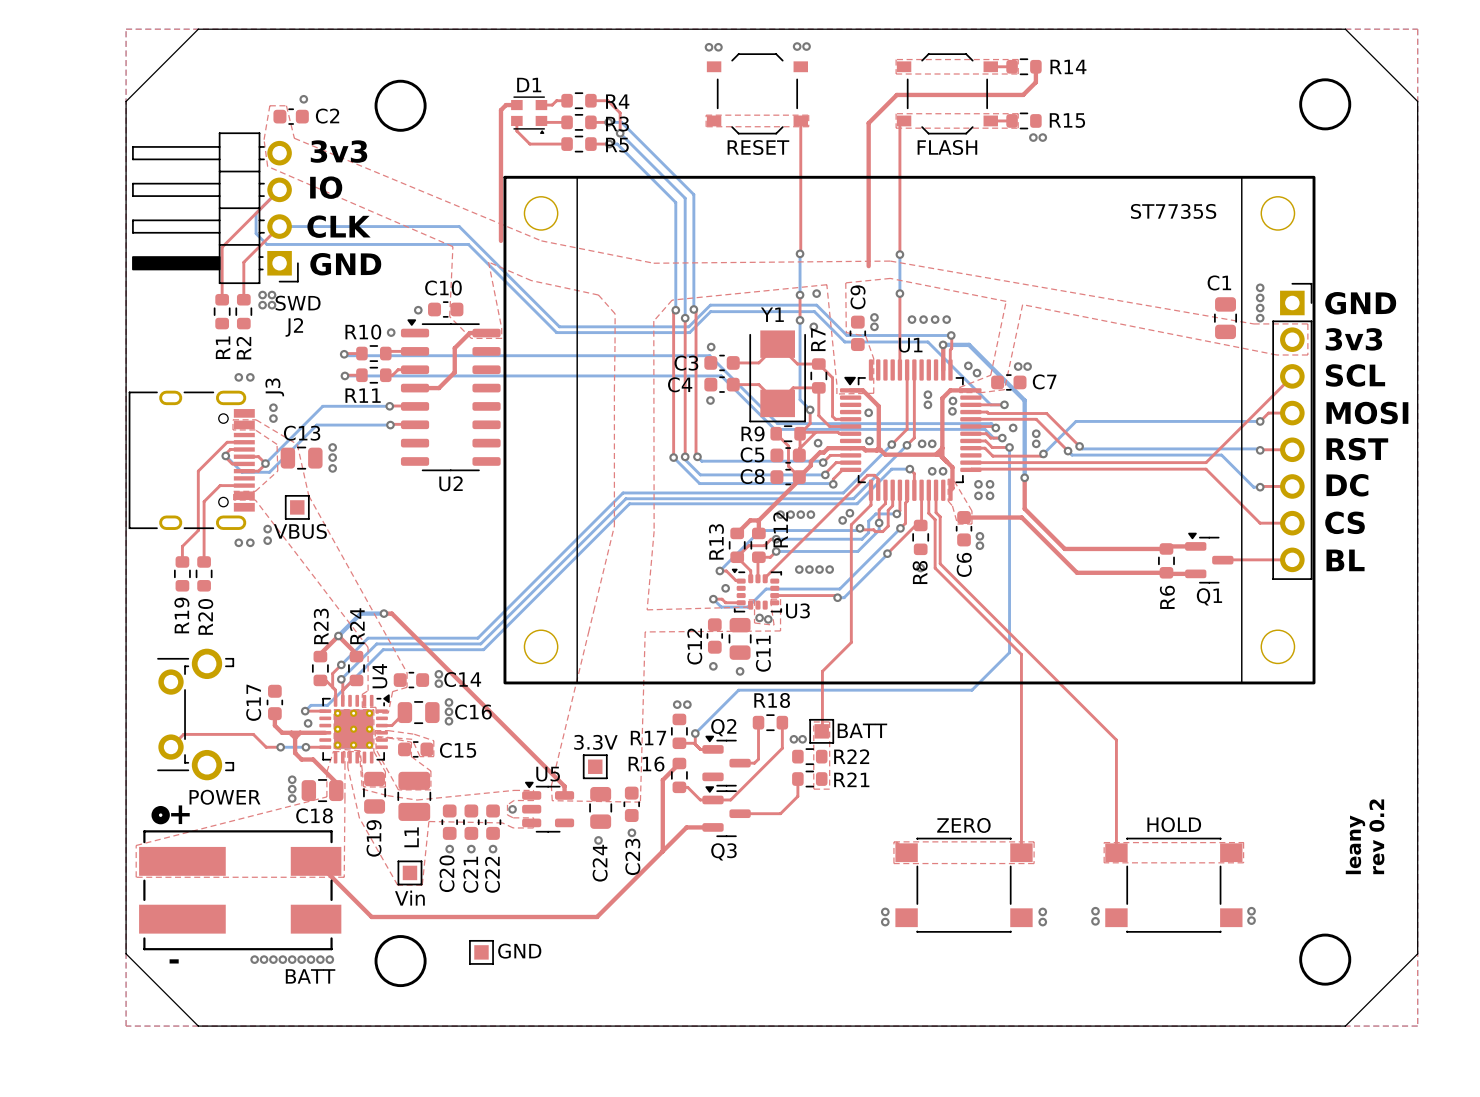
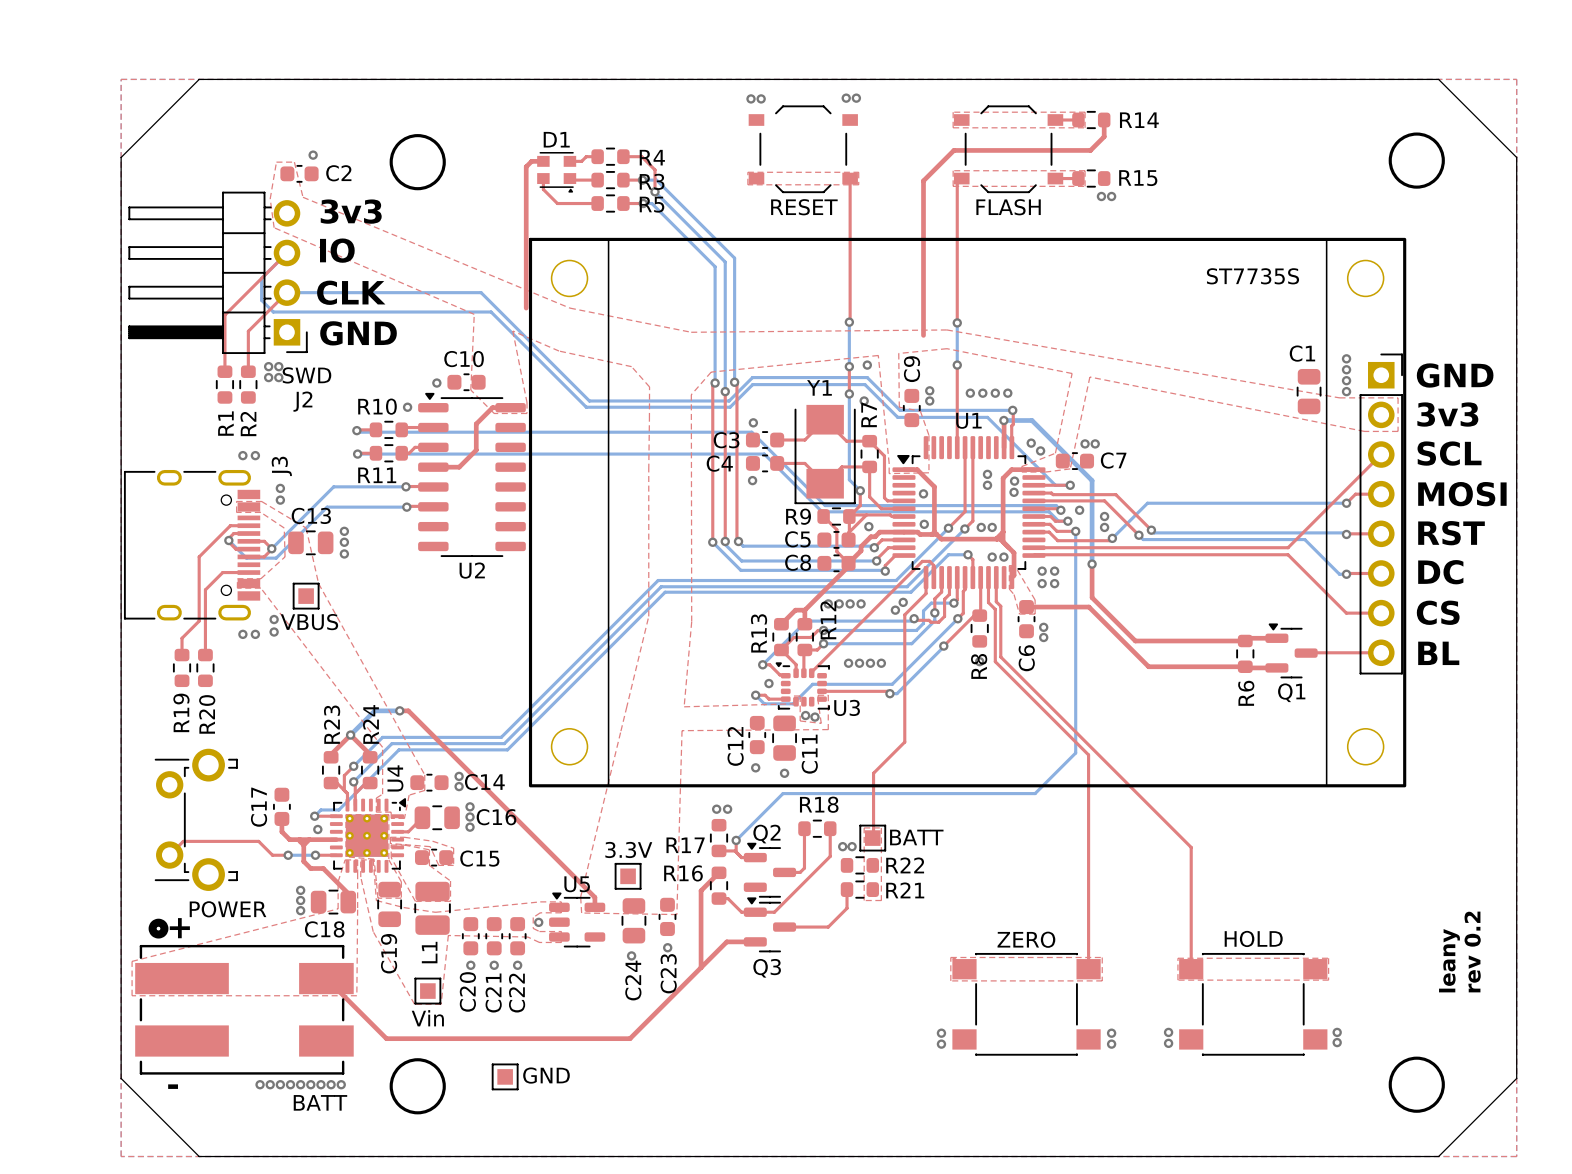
J2 footprint: [132, 132, 299, 285] -> [128, 191, 308, 355]

